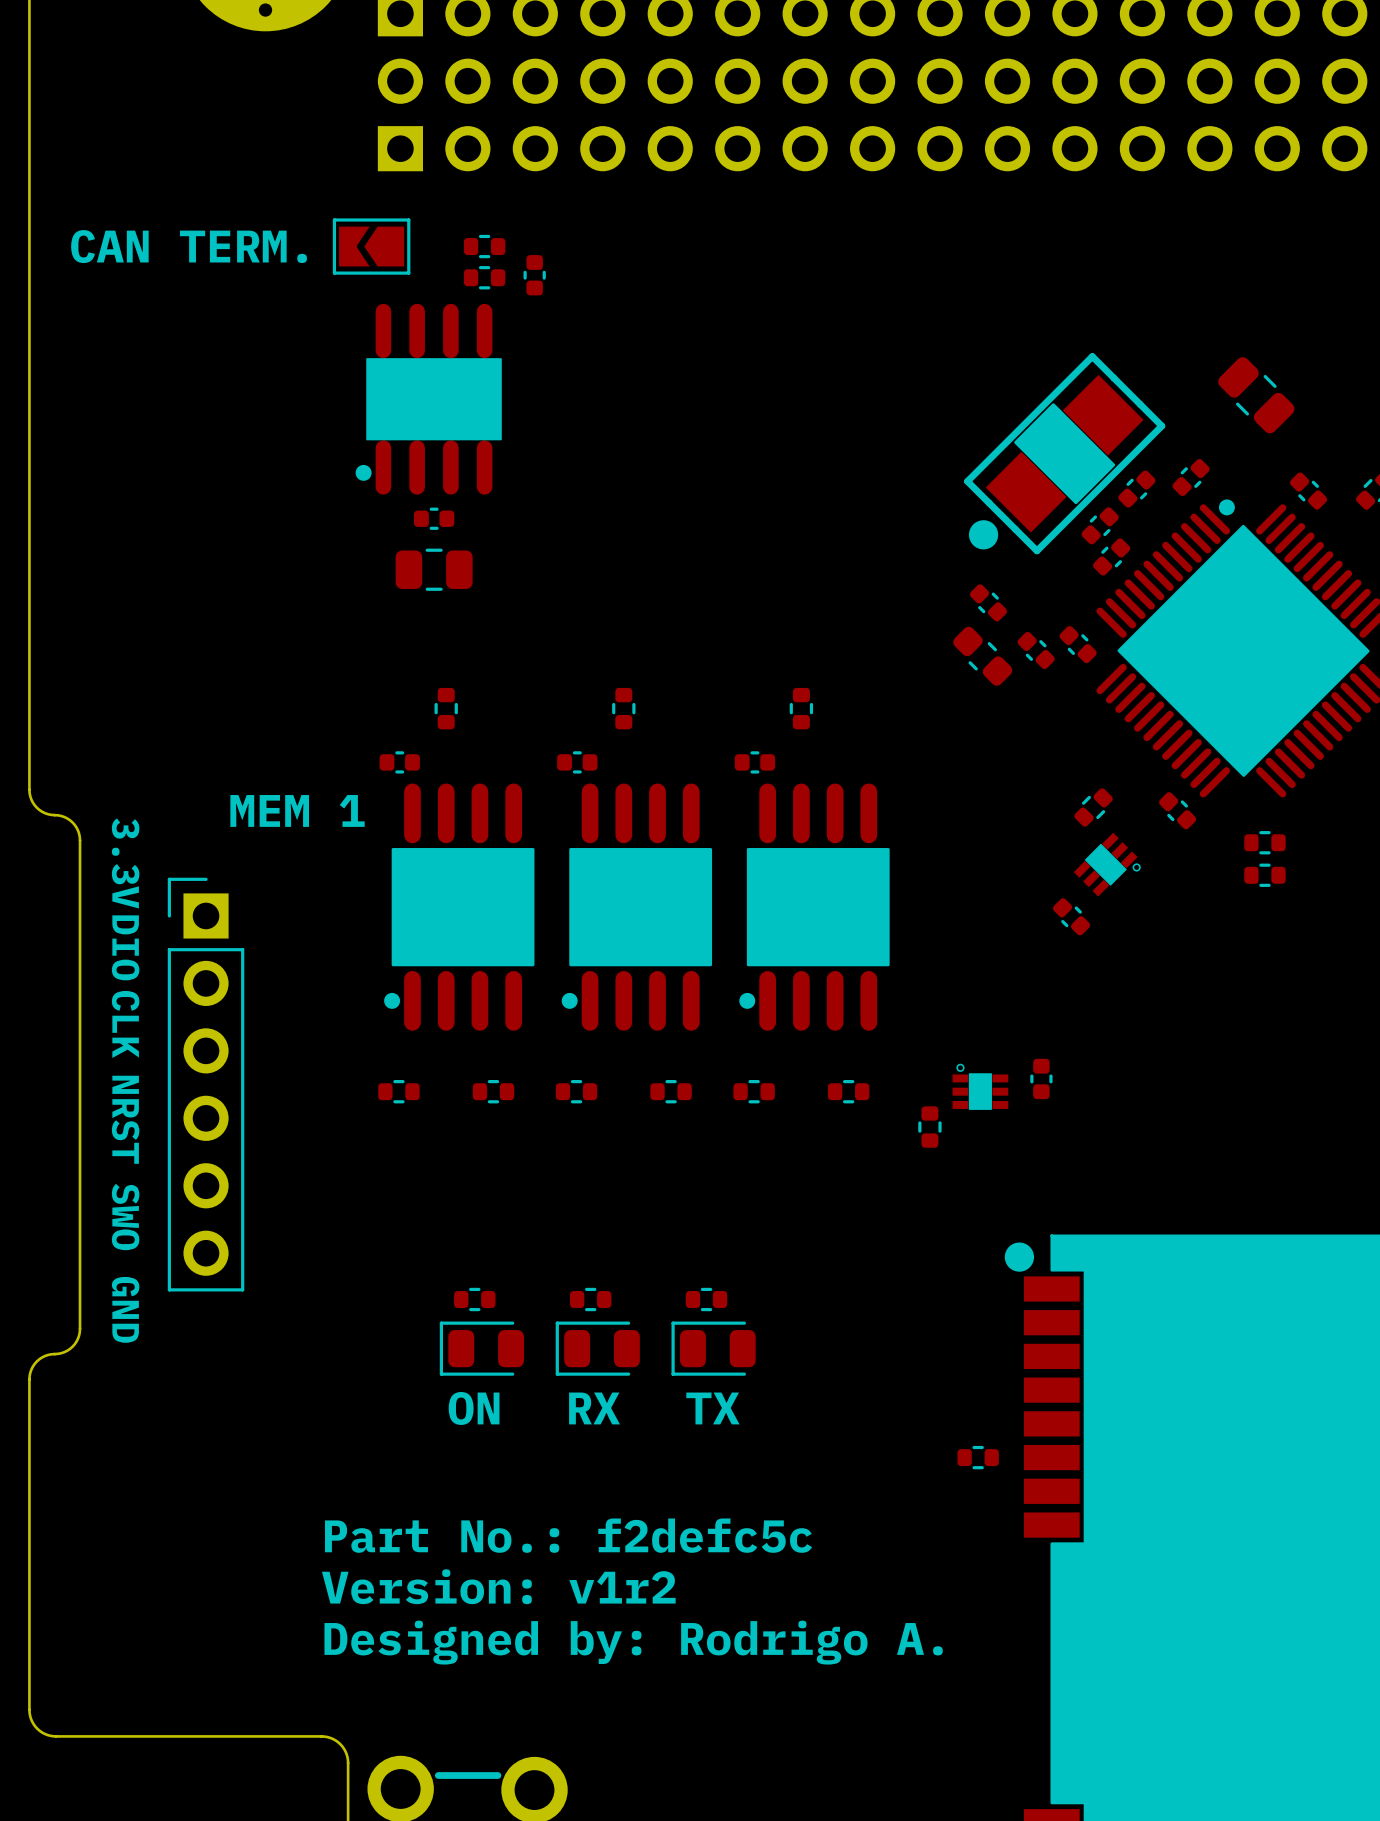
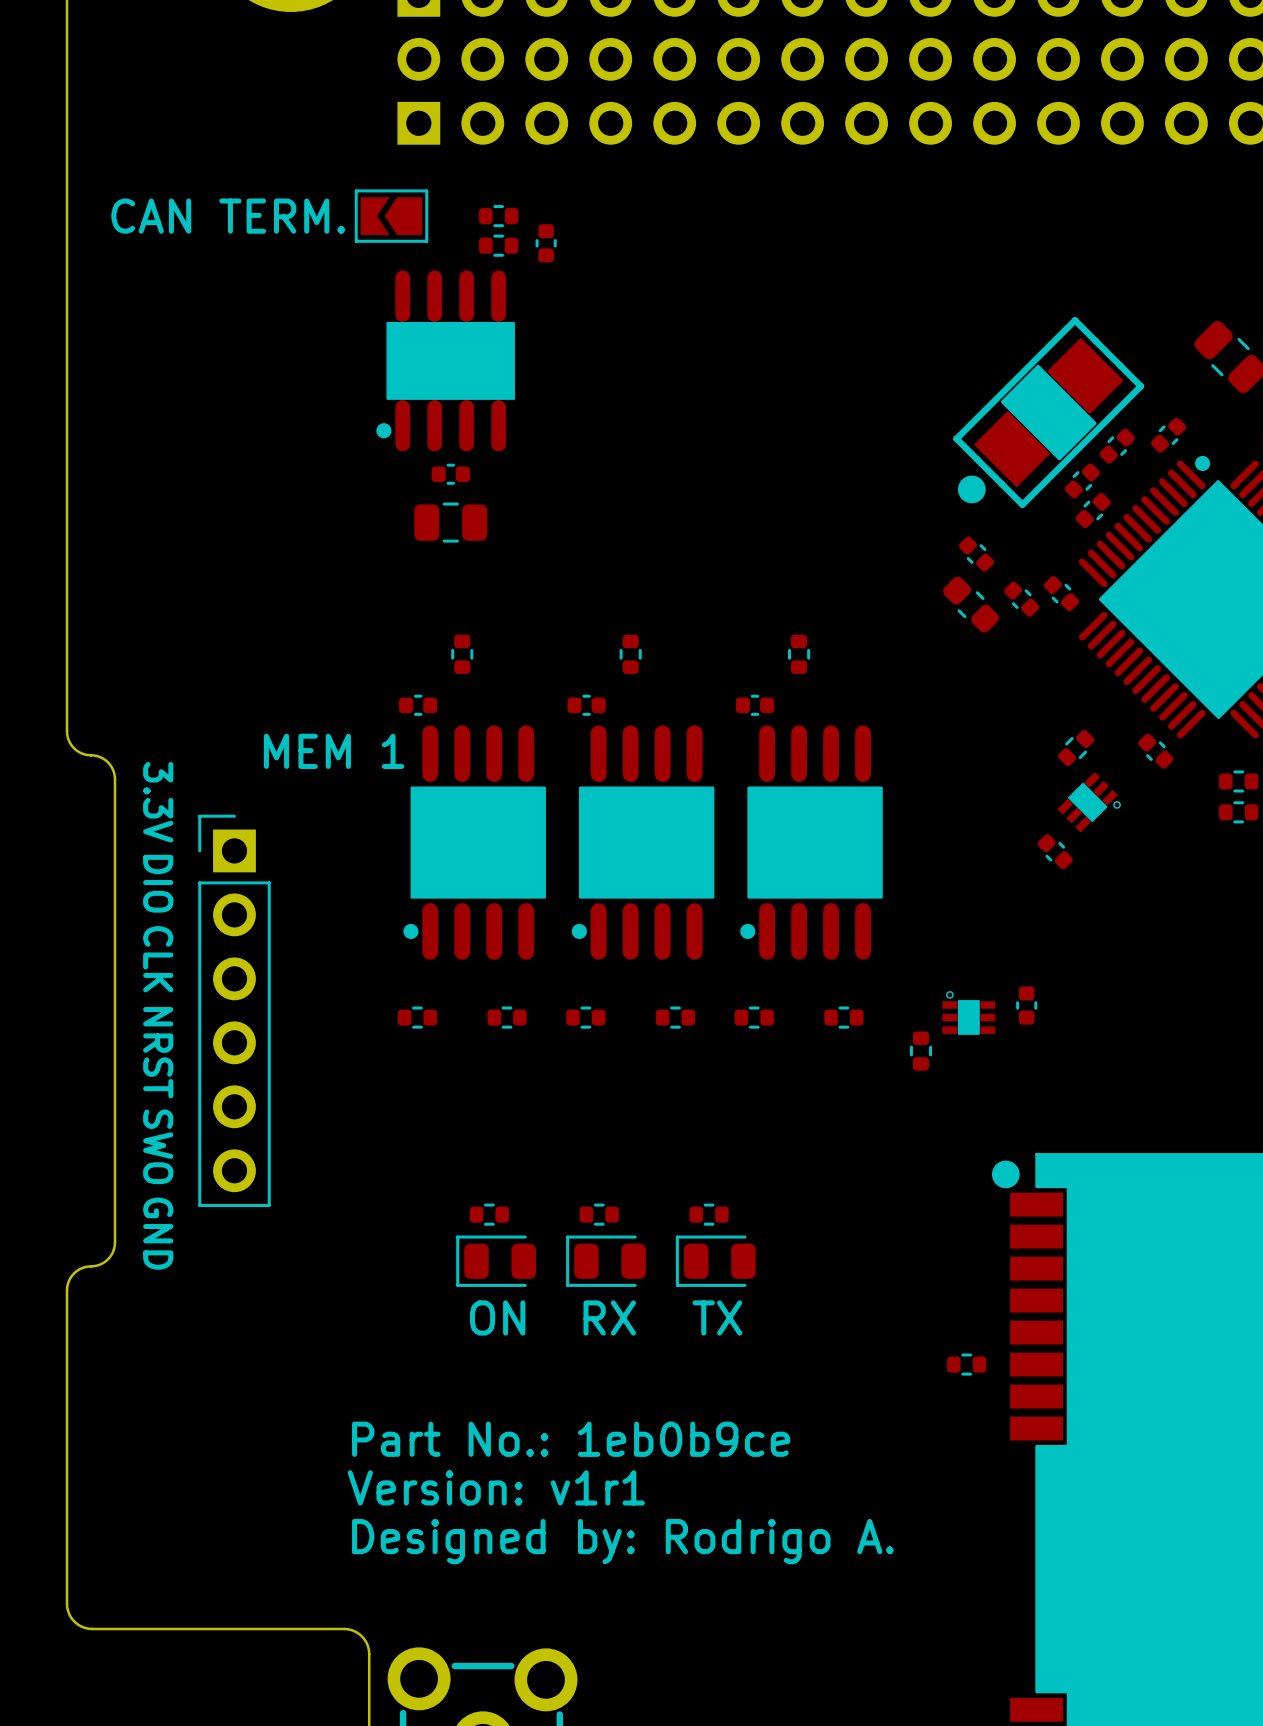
text: Part No.: f2defc5c (568, 1535) -> Part No.: 1eb0b9ce (571, 1439)
text: Version: v1r2 (498, 1586) -> Version: v1r1 (496, 1487)

